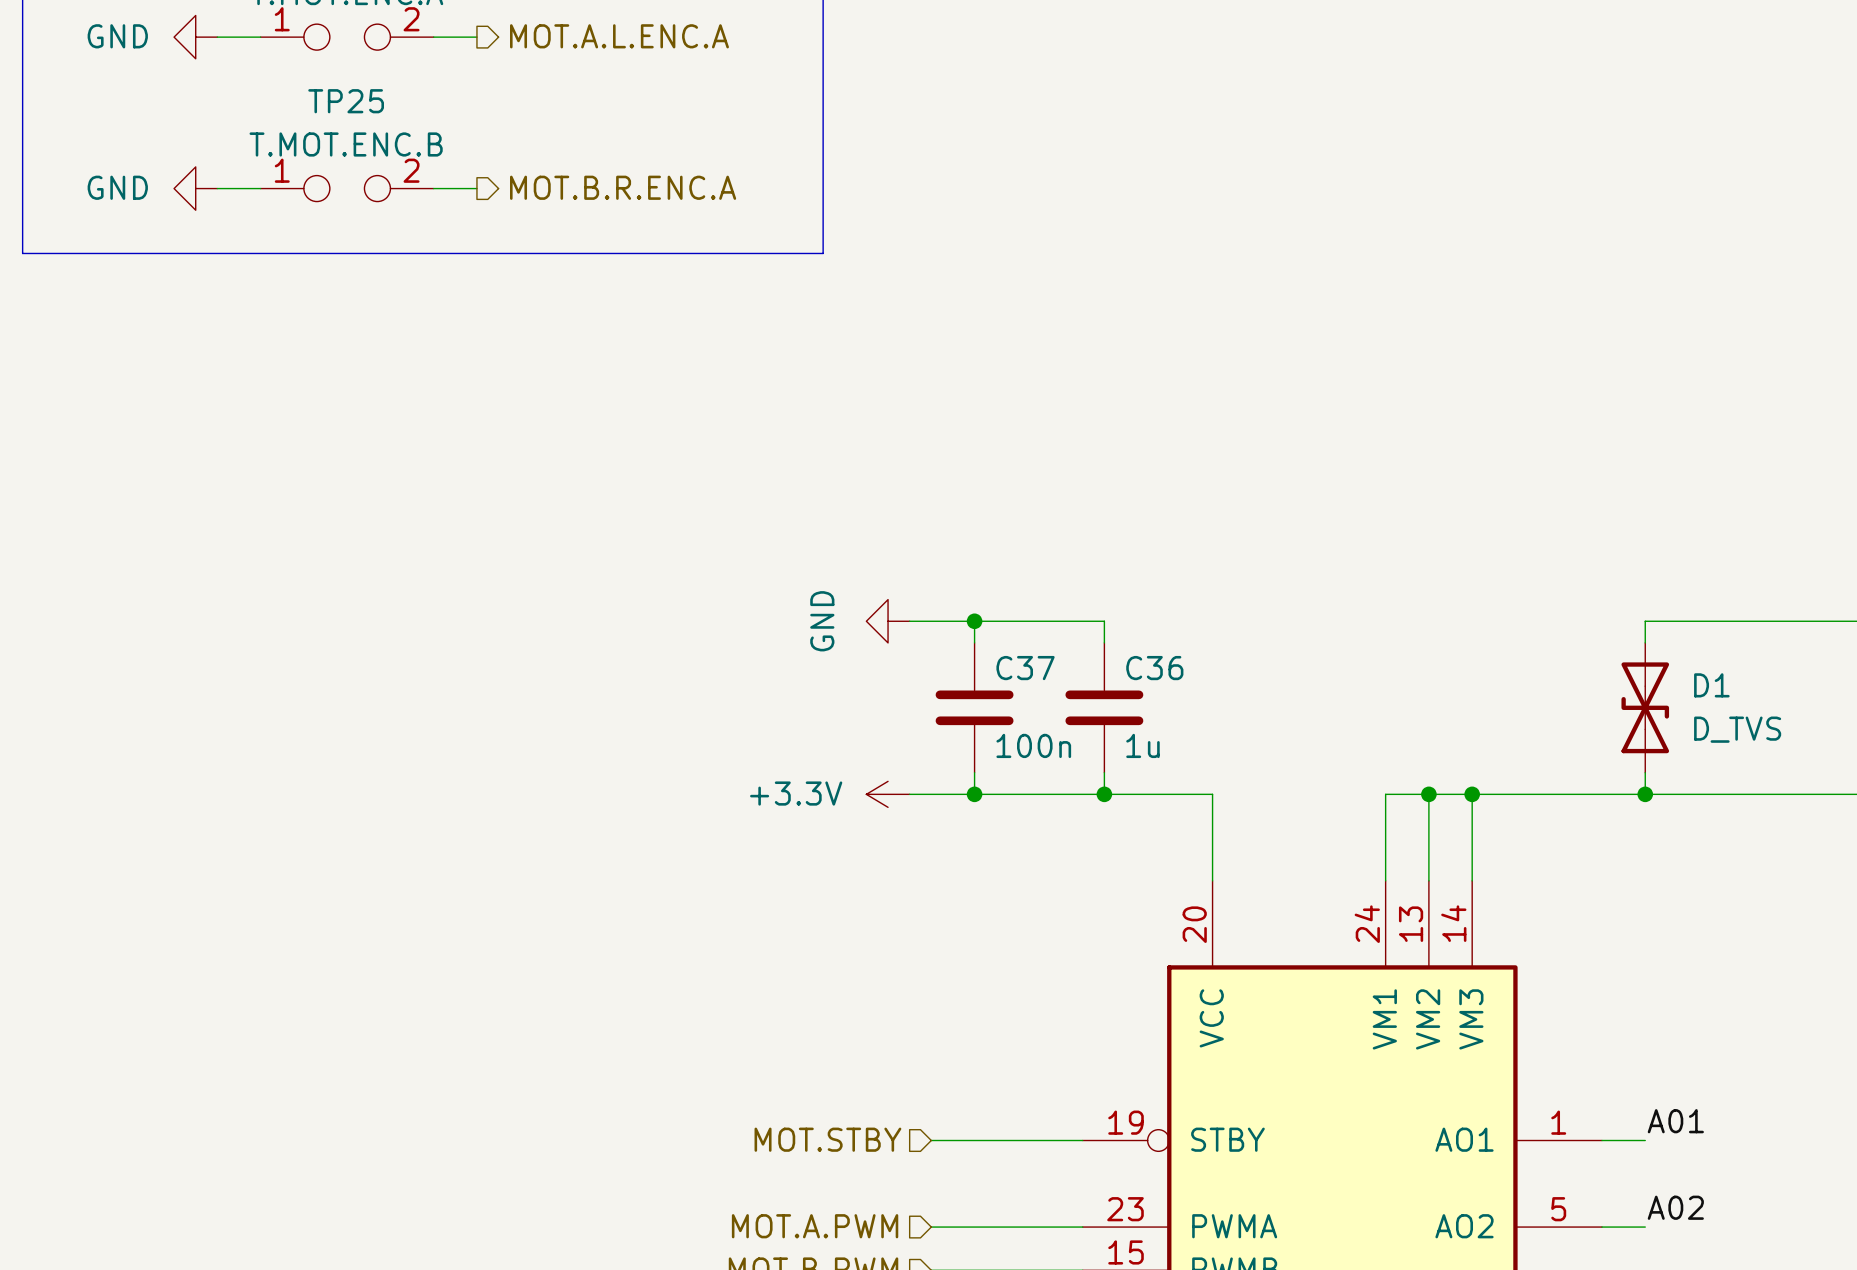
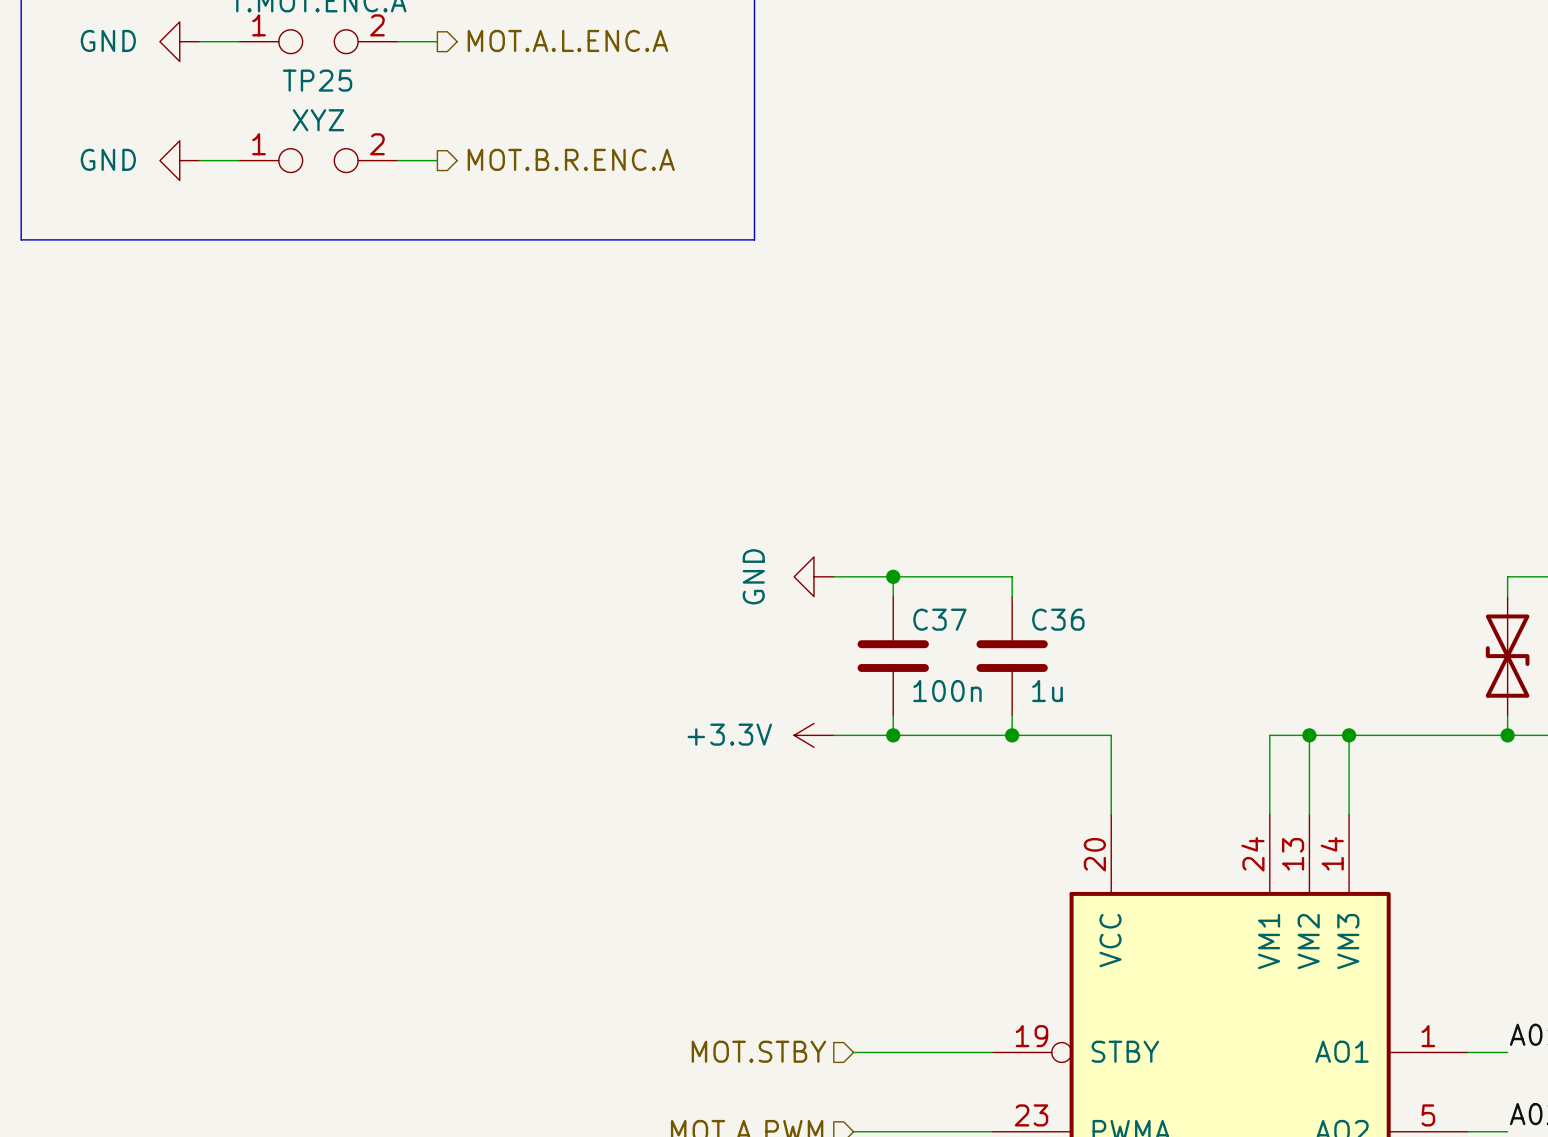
TP25 value: T.MOT.ENC.B (346, 144) -> XYZ (318, 120)
hierarchical label position: MOT.B.R.ENC.A (623, 187) -> MOT.B.R.ENC.A (571, 159)
power symbol position: GND (195, 188) -> GND (179, 160)
wire: (217, 188) (260, 188) -> (199, 160) (239, 160)
TP25 position: (347, 188) -> (318, 160)
wire: (433, 188) (476, 188) -> (397, 160) (437, 160)

